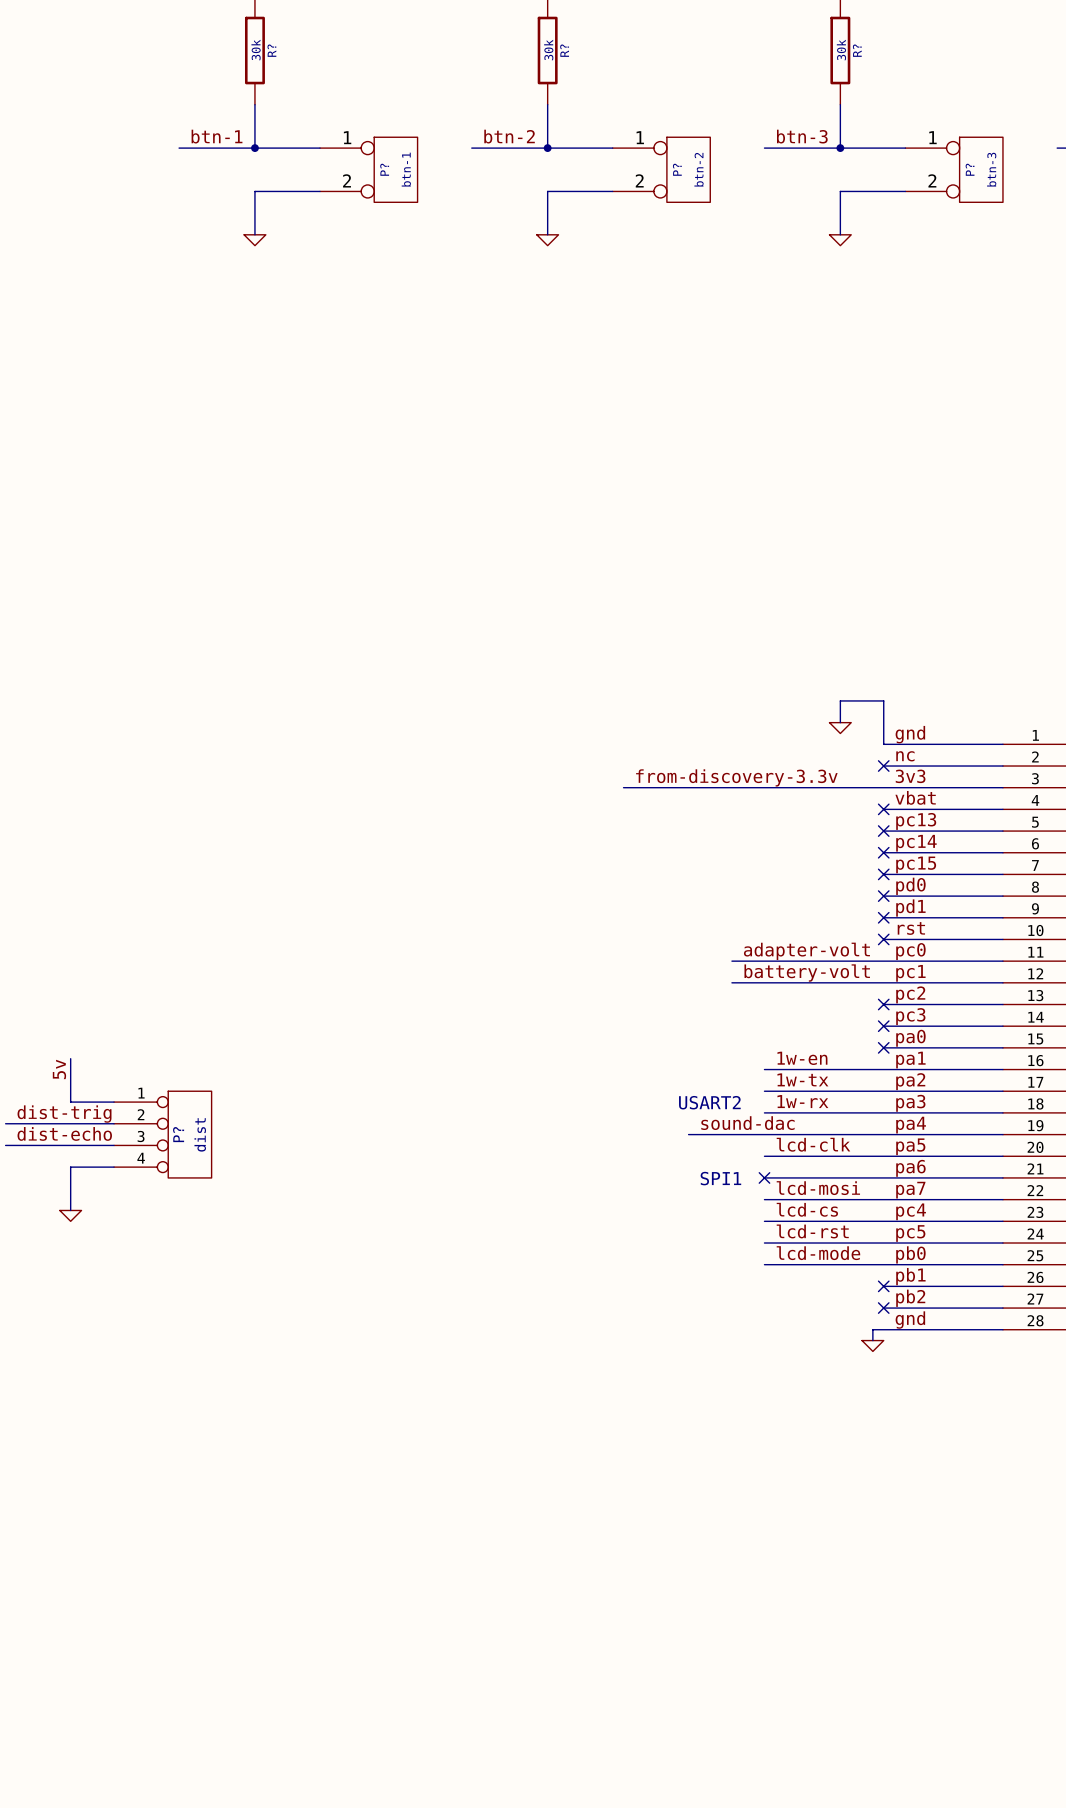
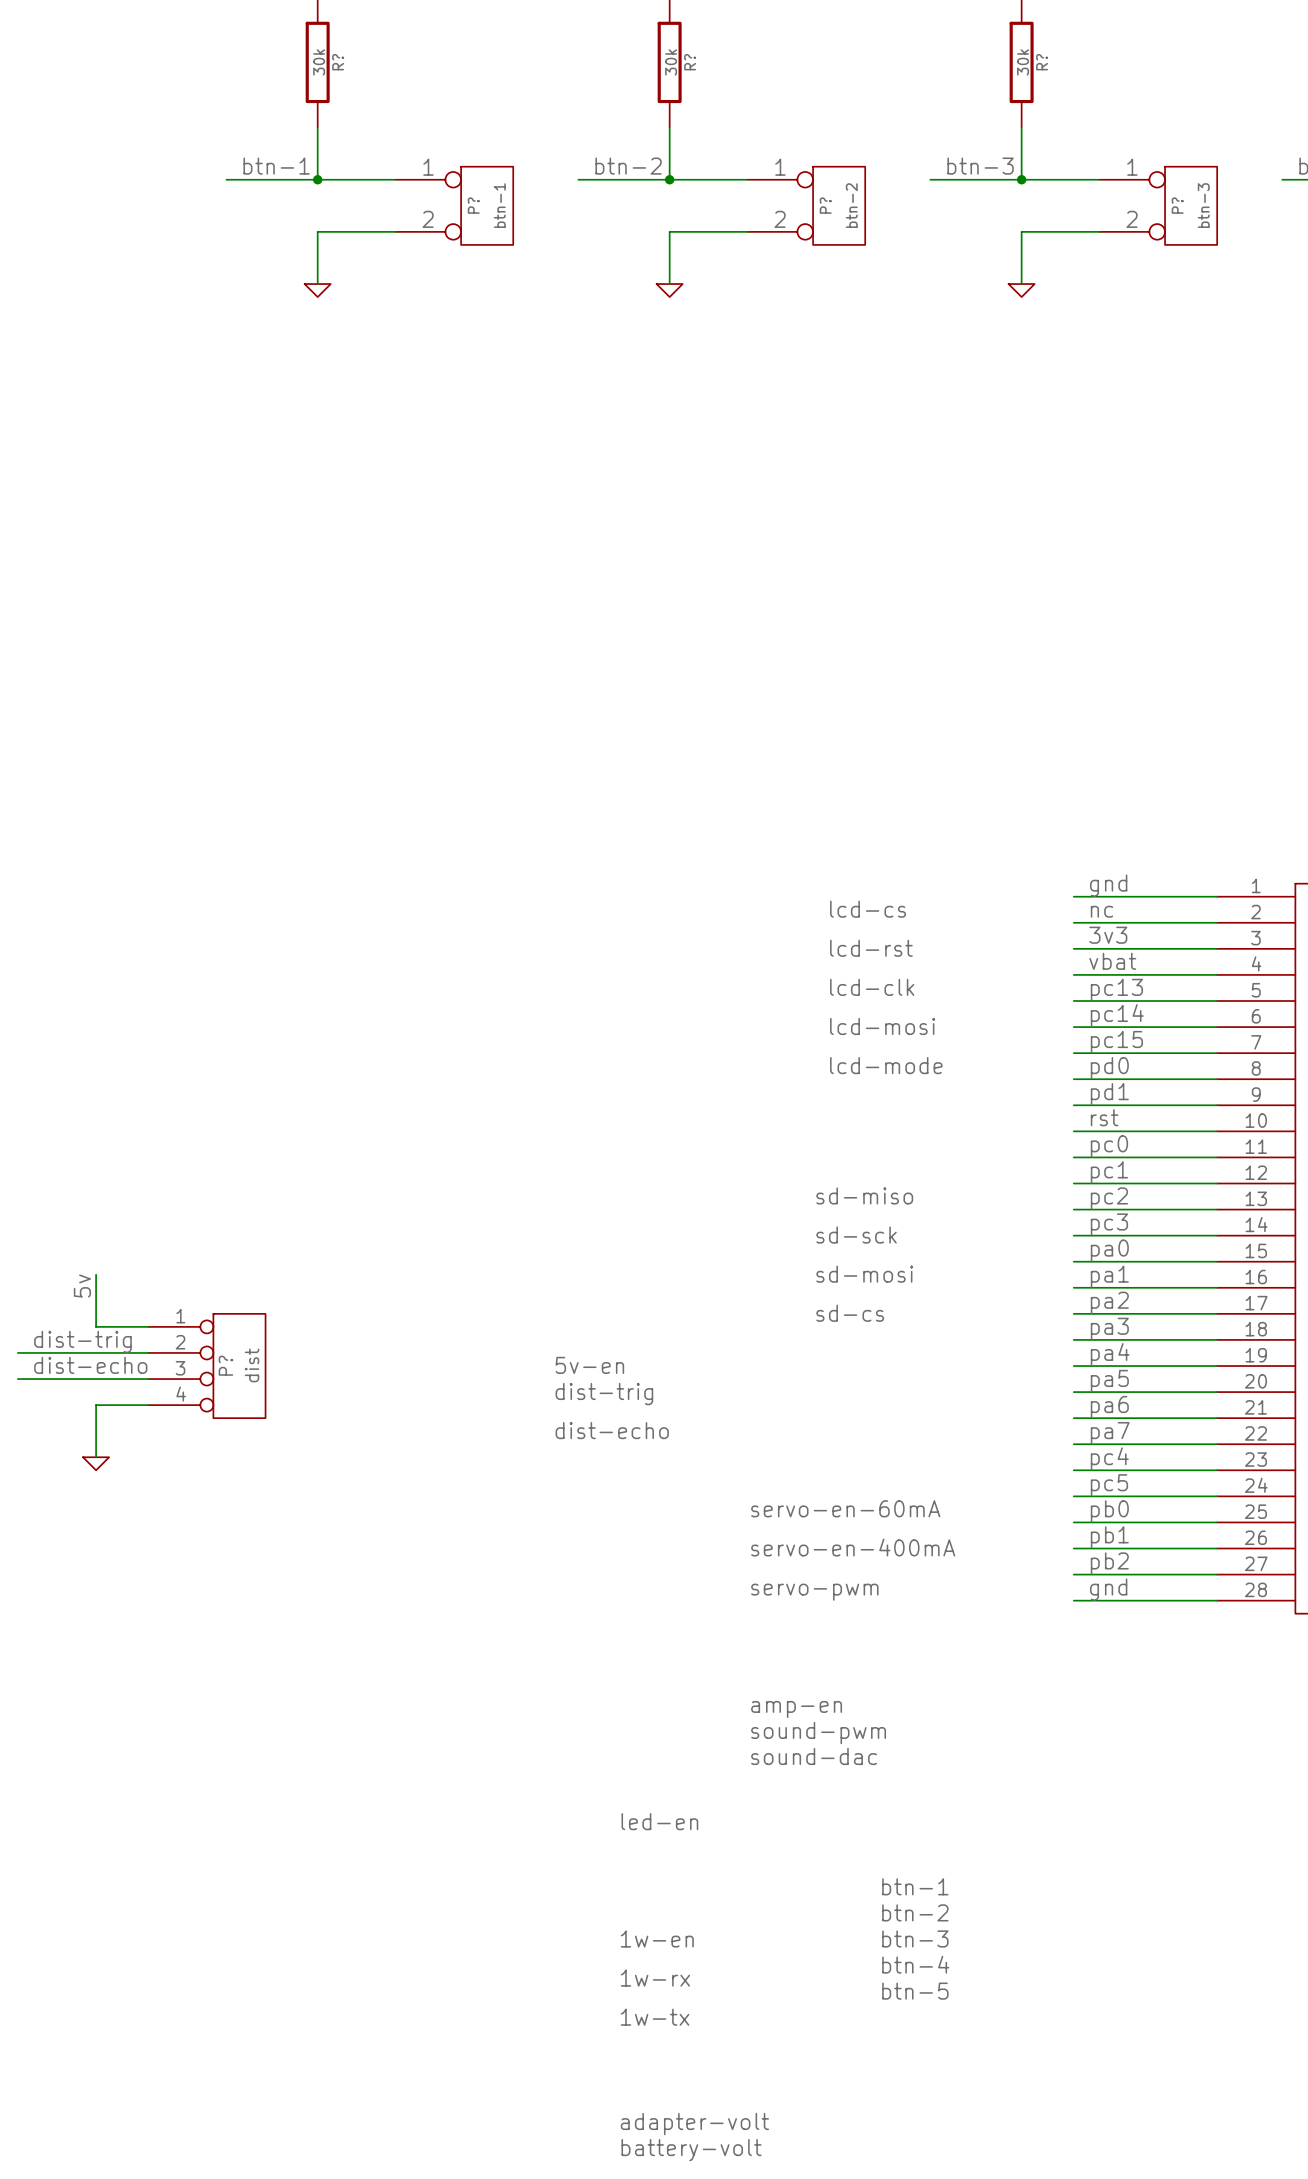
wire: (840, 722) (840, 700) (883, 700) (883, 744) -> none
power symbol: (840, 728) -> none
label: none -> lcd-cs (868, 909)
no-connect mark: (883, 766) -> none
label: from-discovery-3.3v (736, 777) -> none
label: none -> lcd-rst (871, 948)
wire: (623, 787) (883, 787) -> none
no-connect mark: (883, 809) -> none
label: none -> lcd-clk (872, 987)
no-connect mark: (883, 831) -> none
label: none -> lcd-mosi (882, 1026)
no-connect mark: (883, 852) -> none
no-connect mark: (883, 874) -> none
label: none -> lcd-mode (886, 1065)
no-connect mark: (883, 896) -> none
no-connect mark: (883, 917) -> none
no-connect mark: (883, 939) -> none
label: adapter-volt (806, 951) -> none
wire: (731, 961) (883, 961) -> none
label: battery-volt (807, 973) -> none
wire: (731, 982) (883, 982) -> none
label: none -> sd-miso (864, 1195)
no-connect mark: (883, 1004) -> none
label: none -> sd-sck (856, 1235)
no-connect mark: (883, 1026) -> none
no-connect mark: (883, 1047) -> none
label: none -> sd-mosi (864, 1274)
label: 1w-en (802, 1058) -> none
wire: (764, 1069) (883, 1069) -> none
label: 1w-tx (802, 1079) -> none
label: none -> sd-cs (850, 1313)
wire: (764, 1091) (883, 1091) -> none
label: 1w-rx (802, 1101) -> none
text: USART2 (709, 1102) -> none
wire: (764, 1112) (883, 1112) -> none
label: sound-dac (747, 1123) -> none
label: none -> 5v-en (589, 1365)
wire: (688, 1134) (883, 1134) -> none
label: lcd-clk (813, 1144) -> none
wire: (764, 1156) (883, 1156) -> none
label: none -> dist-trig (604, 1394)
wire: (764, 1177) (883, 1177) -> none
no-connect mark: (764, 1177) -> none
text: SPI1 (720, 1178) -> none
label: none -> dist-echo (612, 1430)
label: lcd-mosi (818, 1188) -> none
wire: (764, 1199) (883, 1199) -> none
label: lcd-cs (807, 1209) -> none
wire: (764, 1221) (883, 1221) -> none
label: lcd-rst (812, 1231) -> none
wire: (764, 1243) (883, 1243) -> none
label: none -> servo-en-60mA (845, 1508)
label: lcd-mode (818, 1253) -> none
wire: (764, 1264) (883, 1264) -> none
label: none -> servo-en-400mA (853, 1547)
no-connect mark: (883, 1286) -> none
no-connect mark: (883, 1308) -> none
label: none -> servo-pwm (814, 1592)
wire: (883, 1329) (872, 1329) (872, 1340) -> none
power symbol: (872, 1345) -> none
label: none -> amp-en (796, 1709)
label: none -> sound-pwm (818, 1733)
label: none -> sound-dac (814, 1756)
label: none -> led-en (659, 1821)
label: none -> btn-1 (915, 1886)
label: none -> btn-2 (915, 1912)
label: none -> btn-3 (915, 1938)
label: none -> 1w-en (657, 1938)
label: none -> btn-4 (915, 1964)
label: none -> 1w-rx (655, 1978)
label: none -> btn-5 (915, 1991)
label: none -> 1w-tx (655, 2017)
label: none -> adapter-volt (694, 2124)
label: none -> battery-volt (691, 2150)

